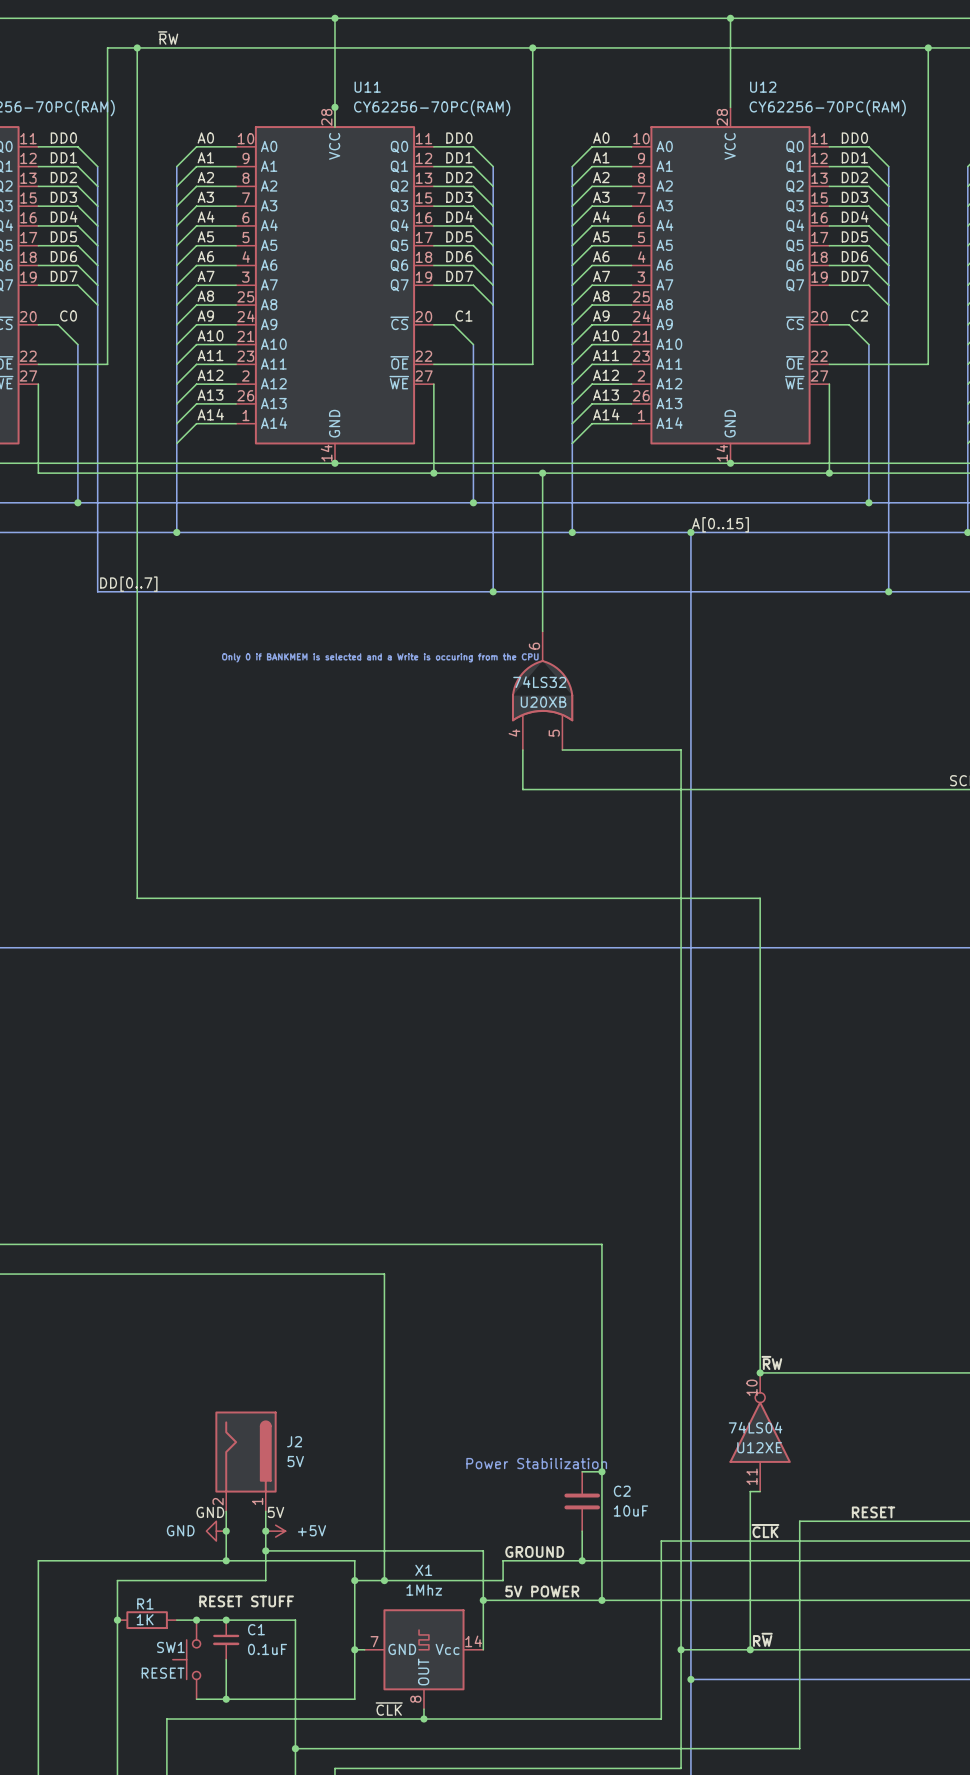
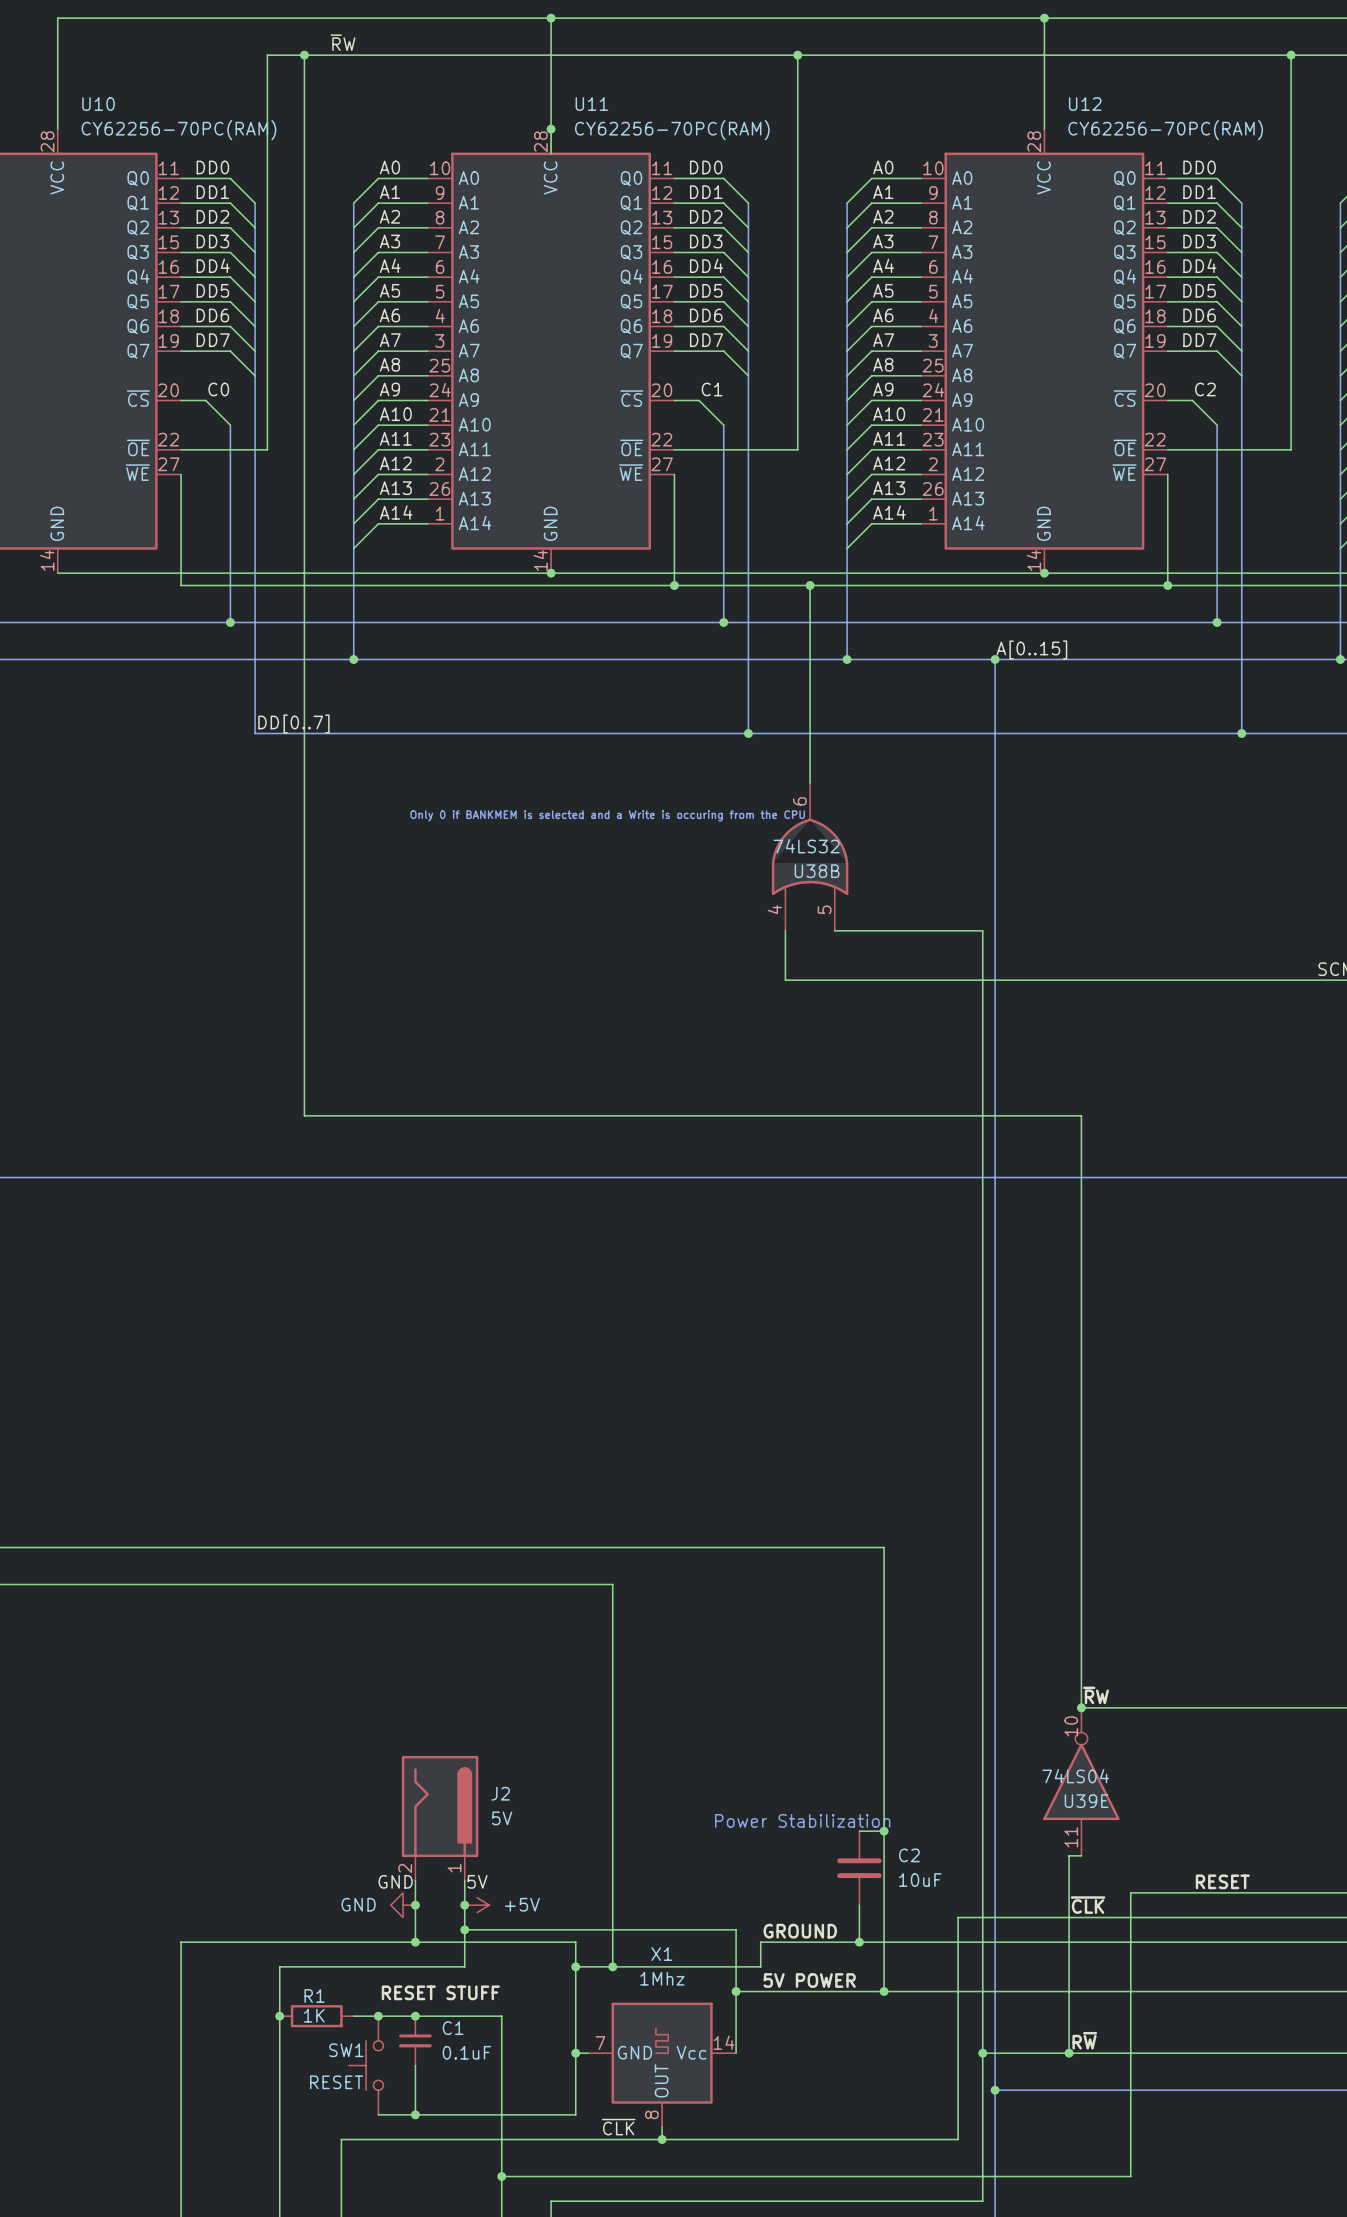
U20XB name: U20XB (543, 702) -> U38B (817, 871)
U12XE name: U12XE (759, 1447) -> U39E (1086, 1801)

